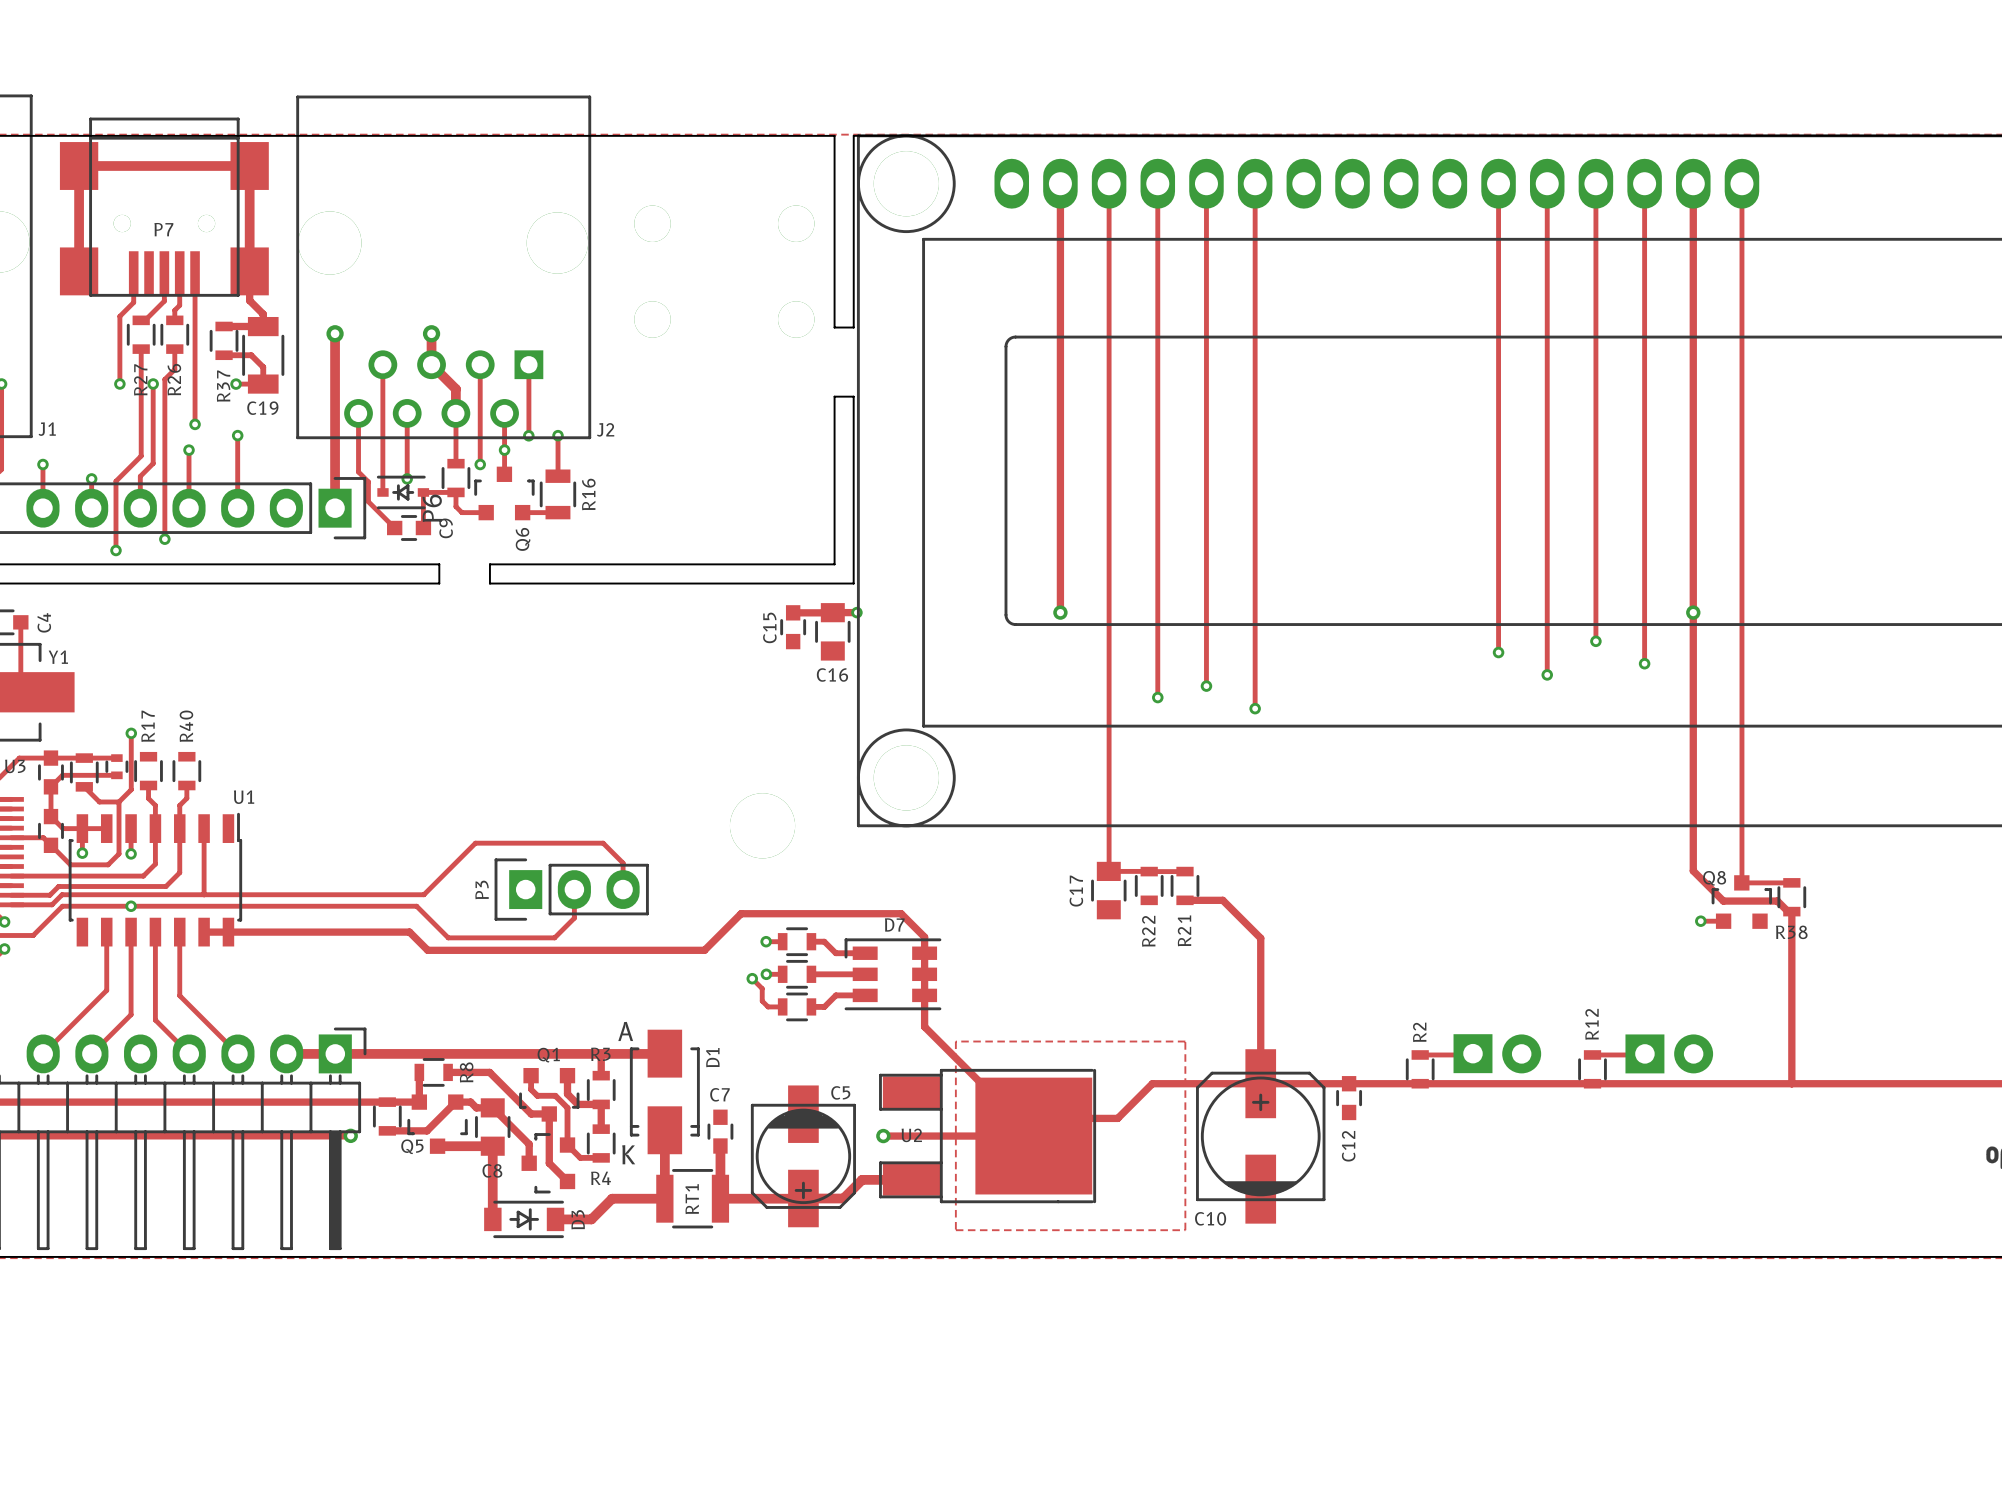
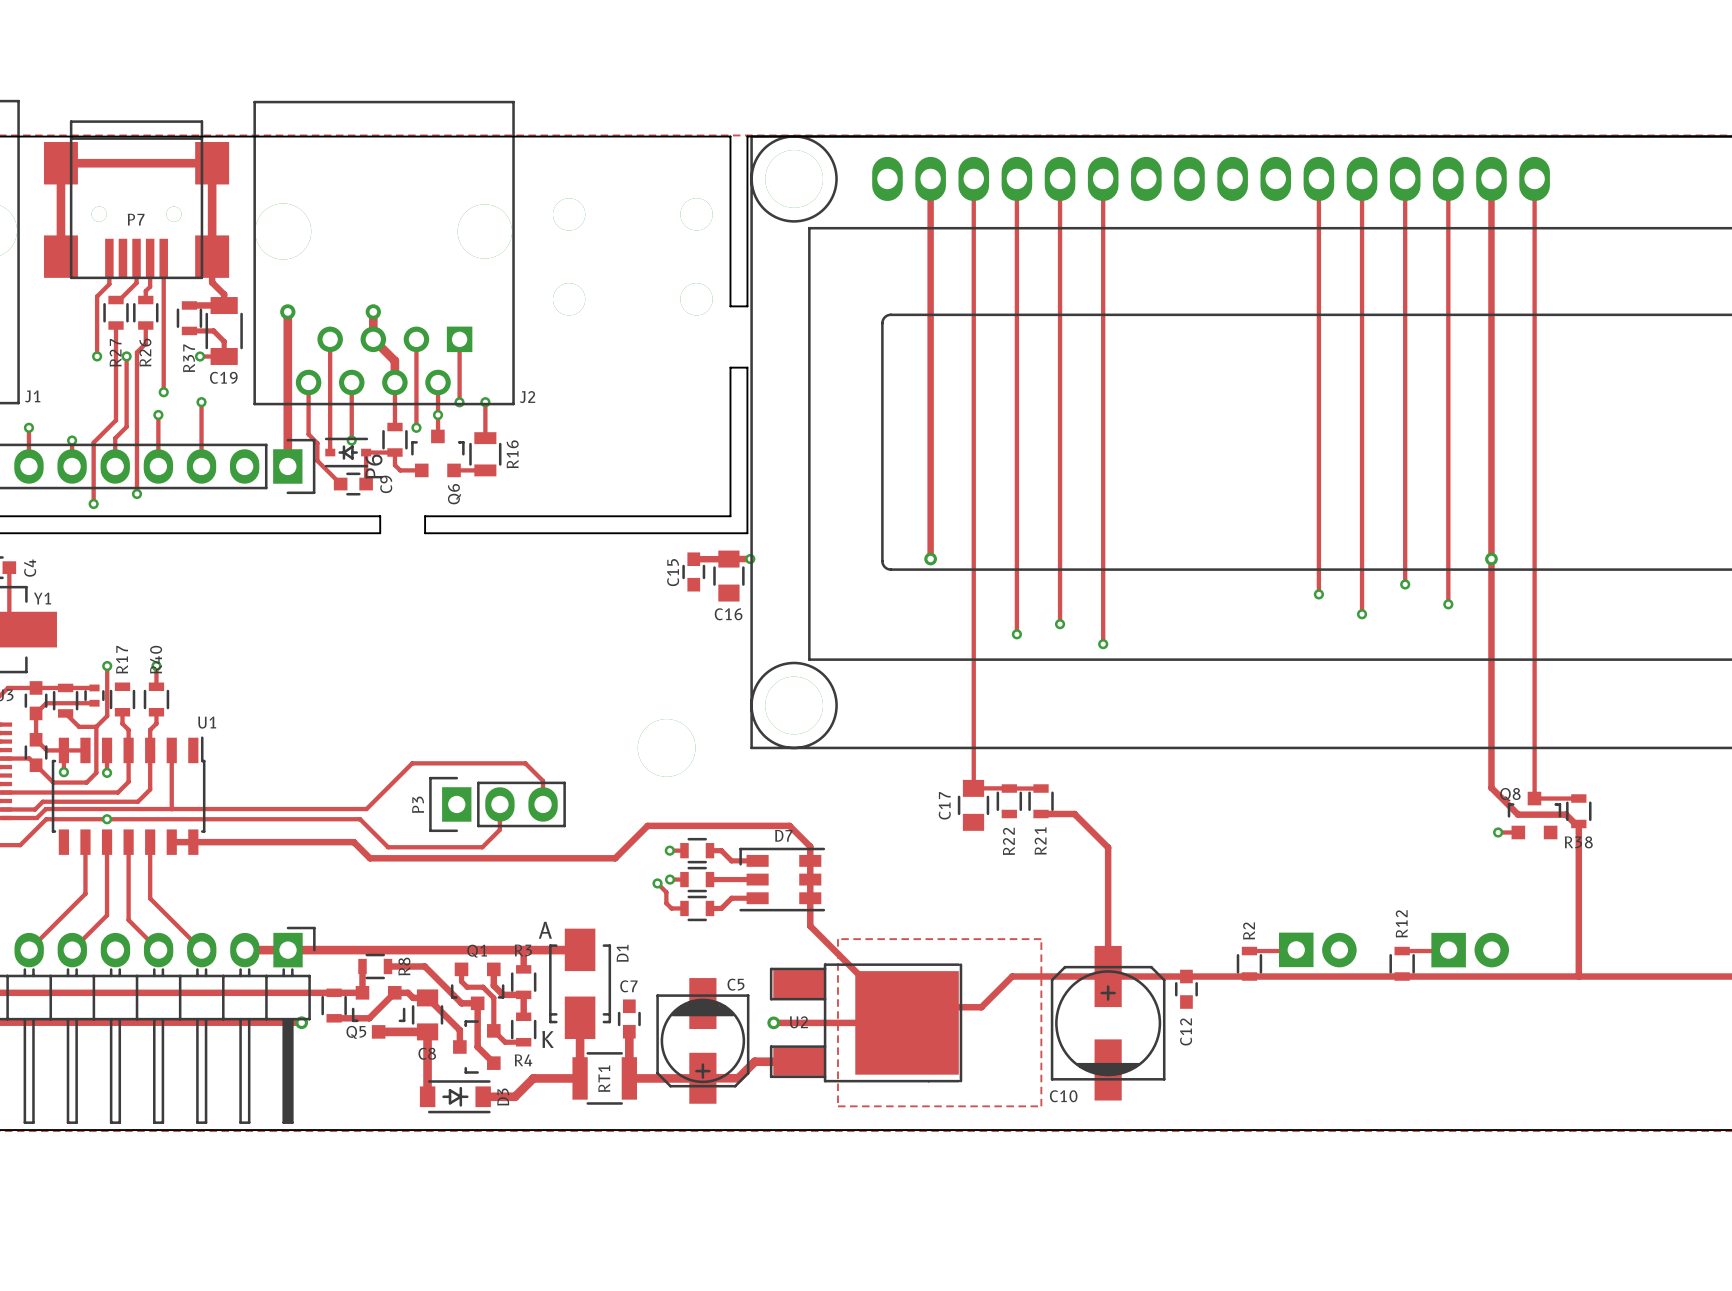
track: none -> (156, 666) (156, 686)
via: none -> (156, 666)

